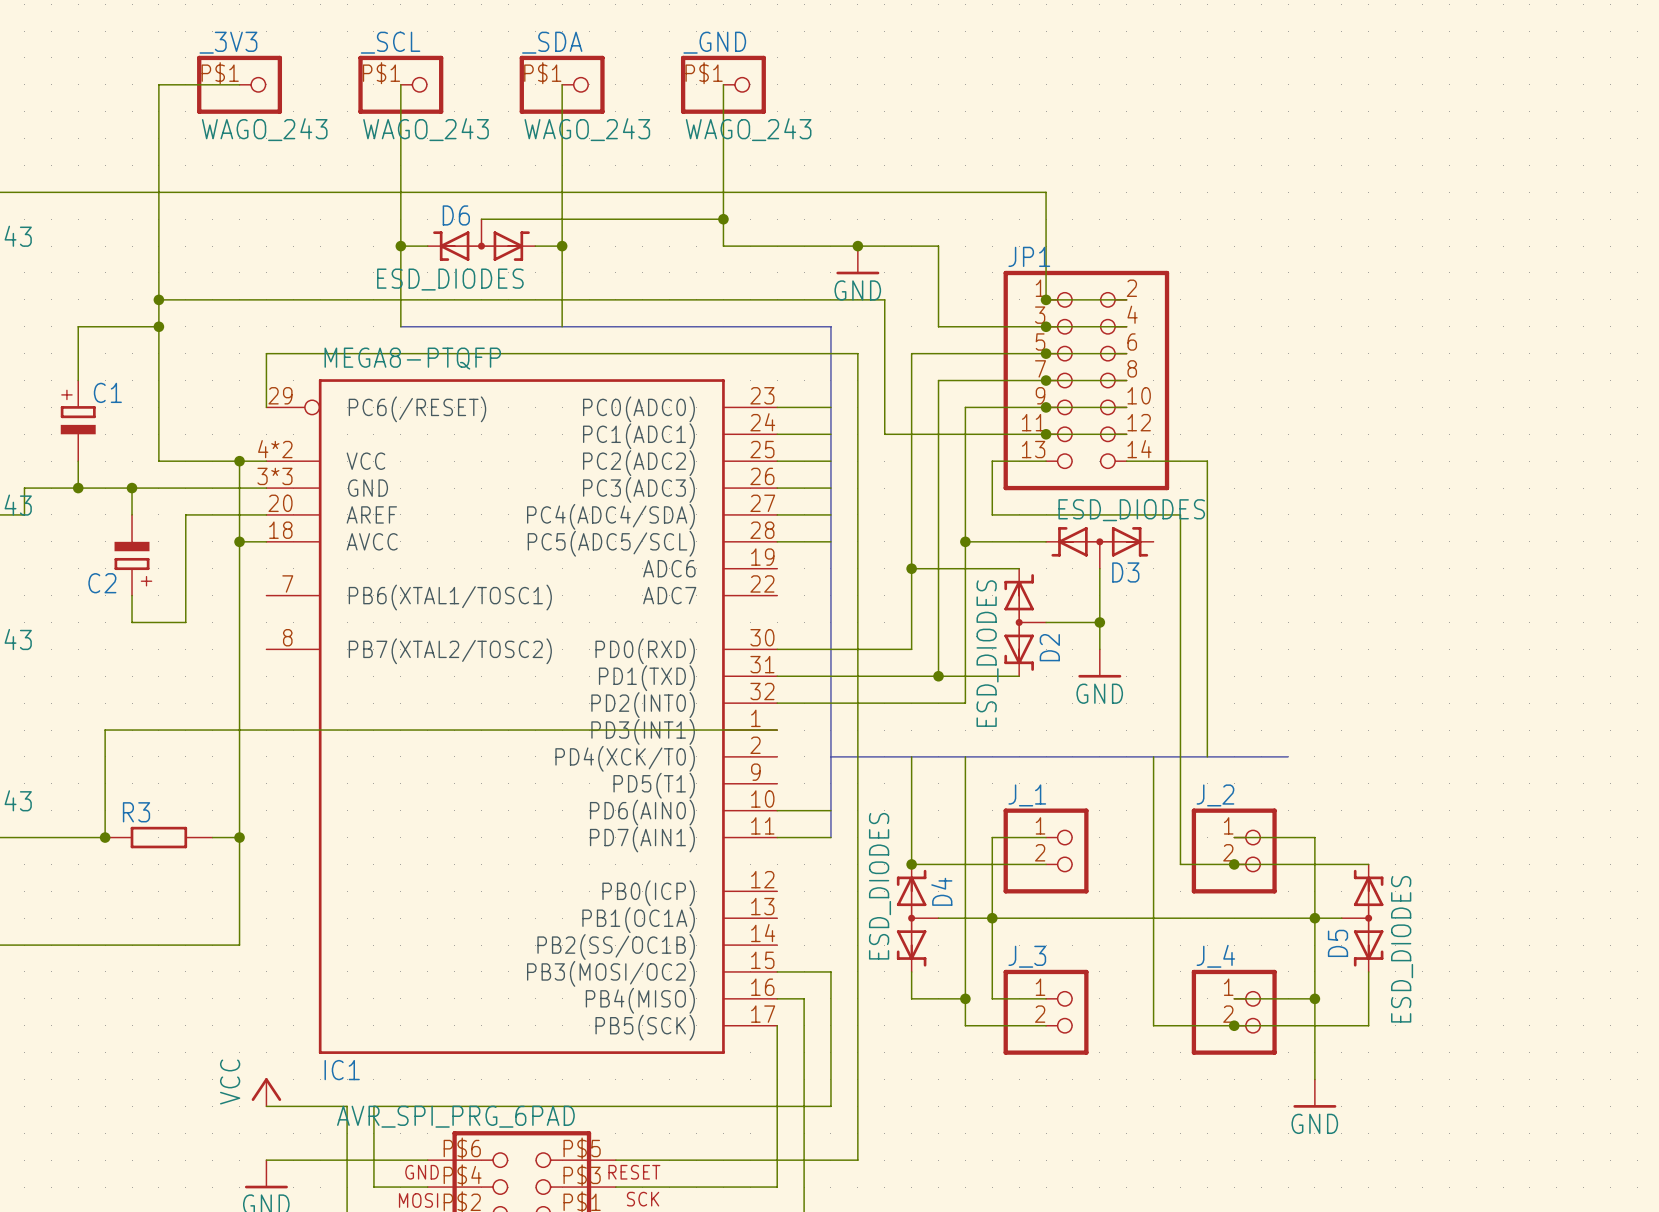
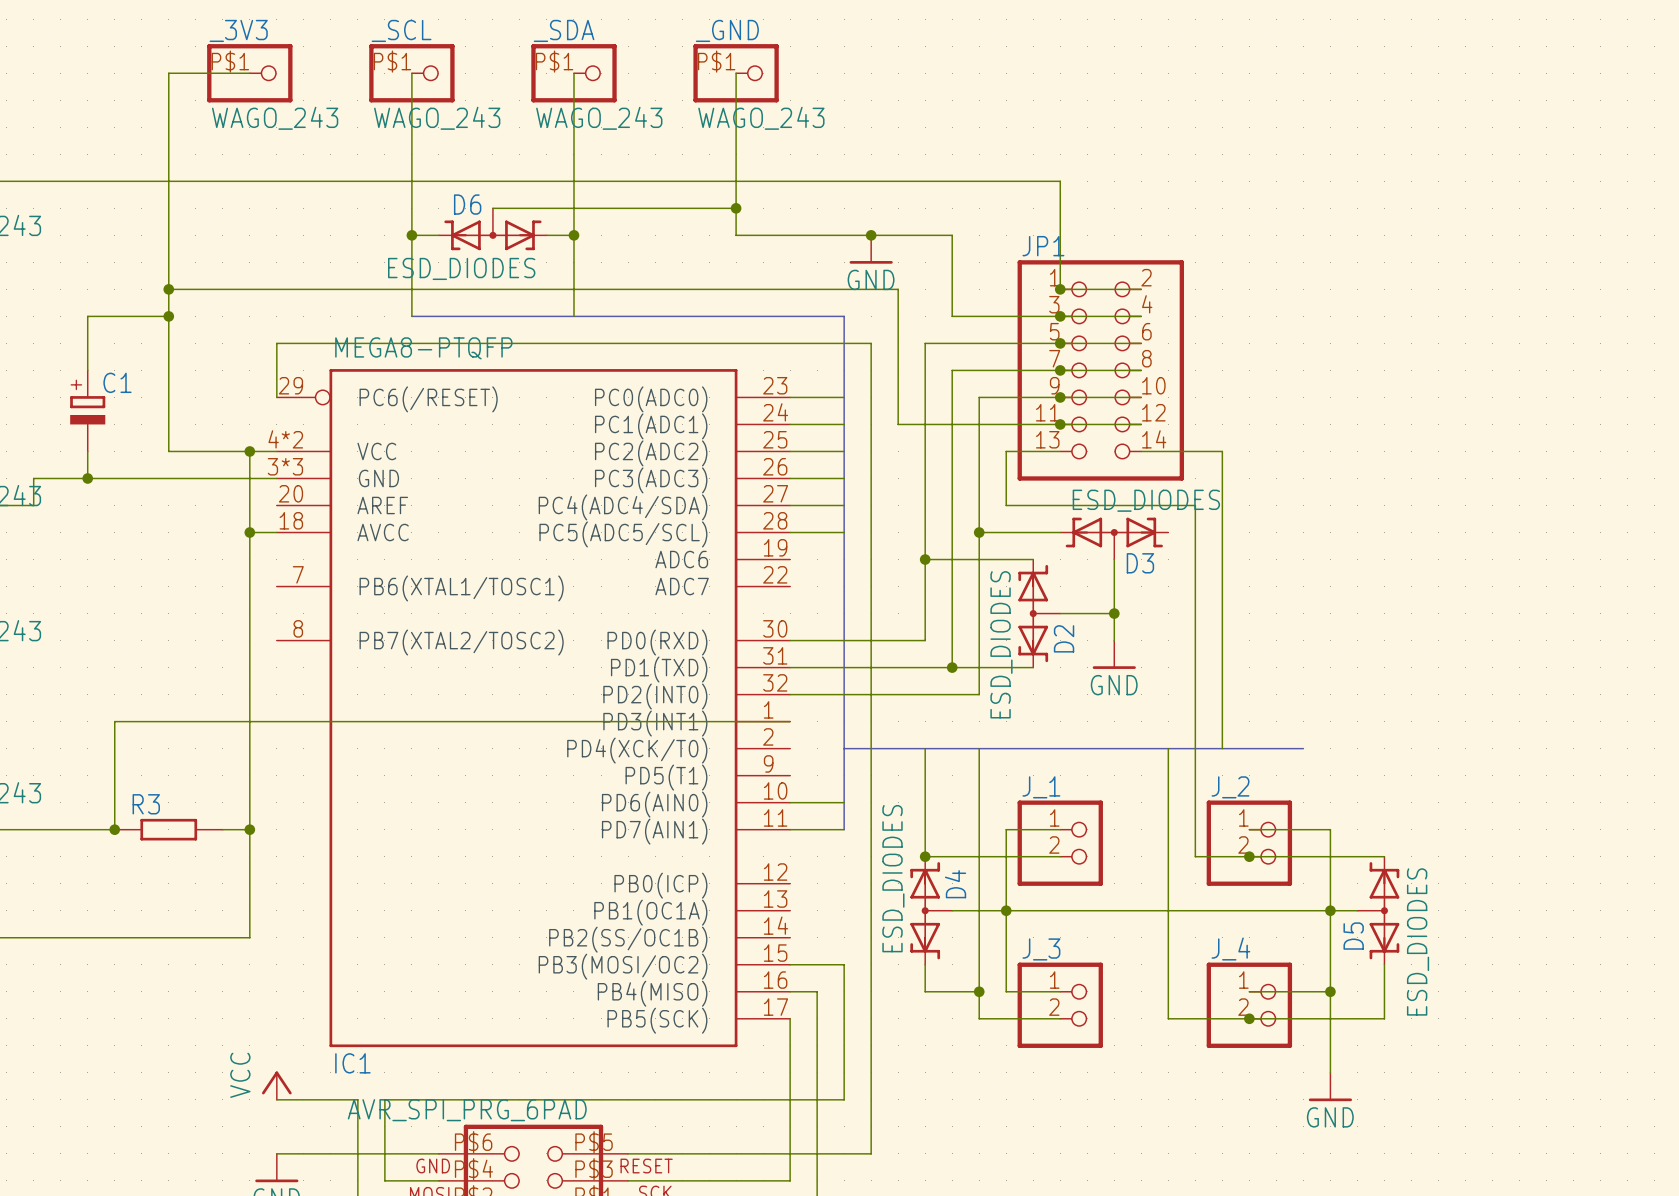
wire: (132, 488) (132, 514) -> none
junction: (132, 488) -> none
wire: (266, 514) (185, 514) (185, 622) (132, 622) (132, 595) -> none
C2: (132, 555) -> none

